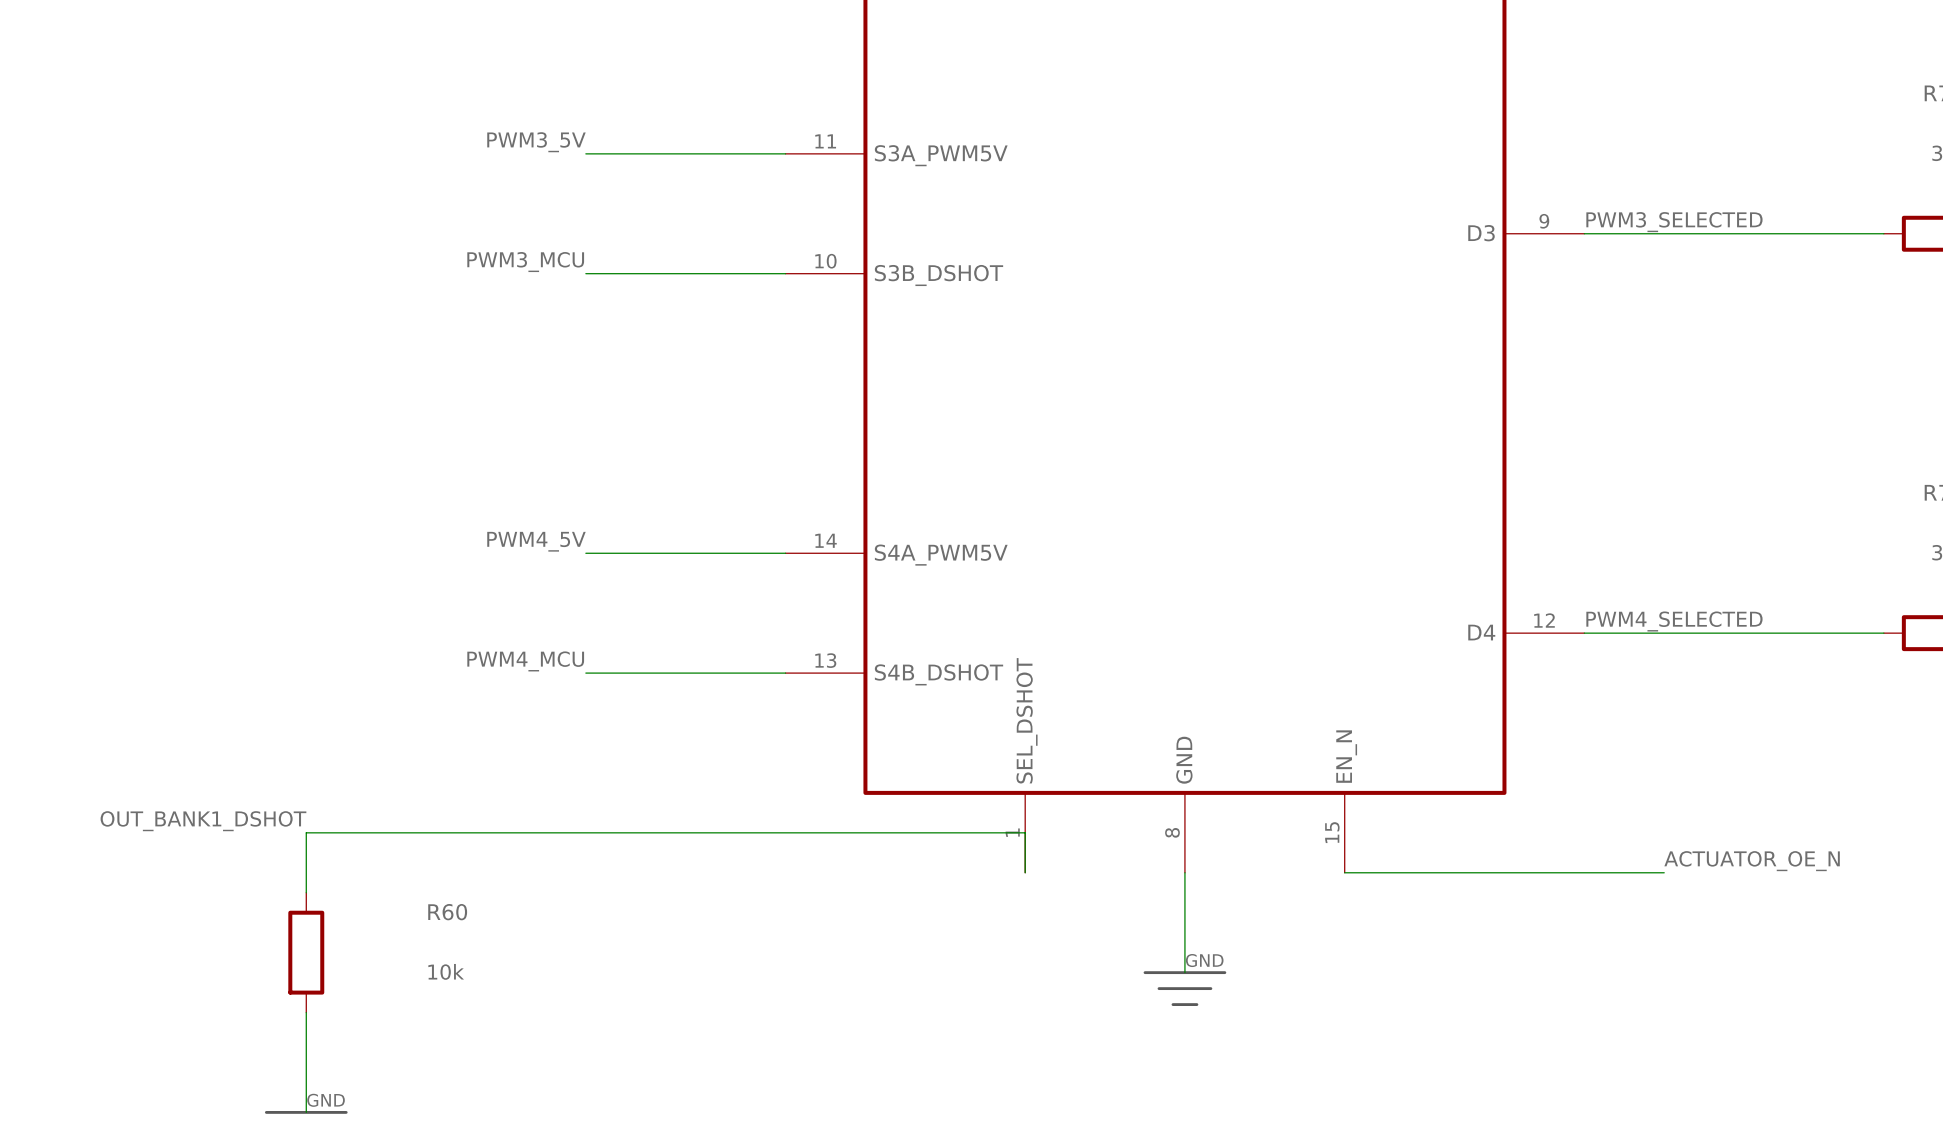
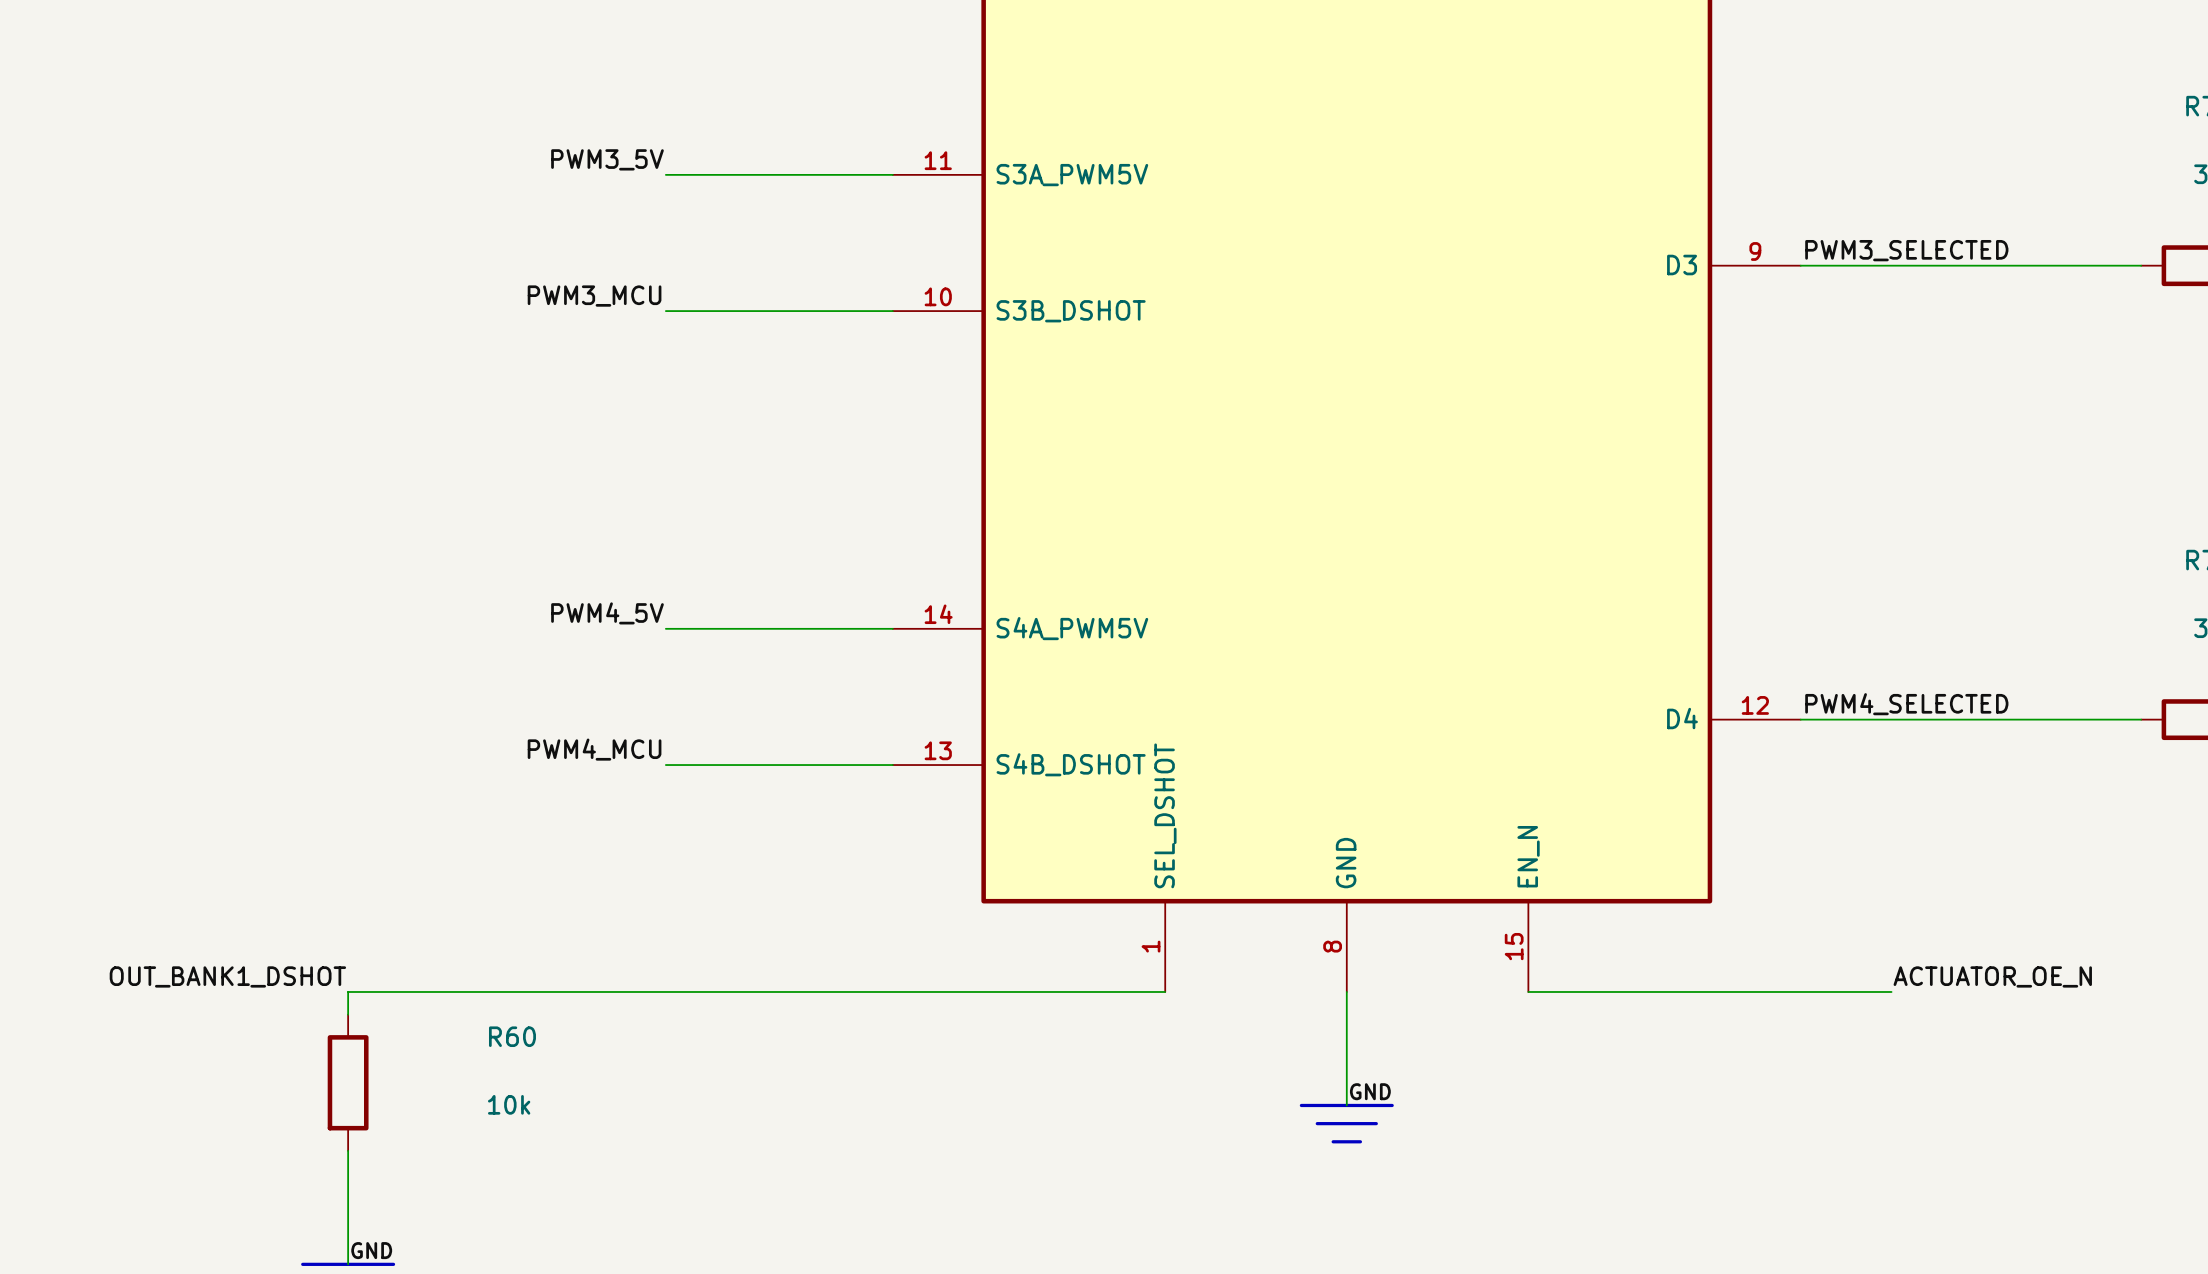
label position: OUT_BANK1_DSHOT (203, 821) -> OUT_BANK1_DSHOT (227, 976)
wire: (306, 872) (306, 832) (1025, 832) (1025, 872) -> (348, 991) (1165, 991)

